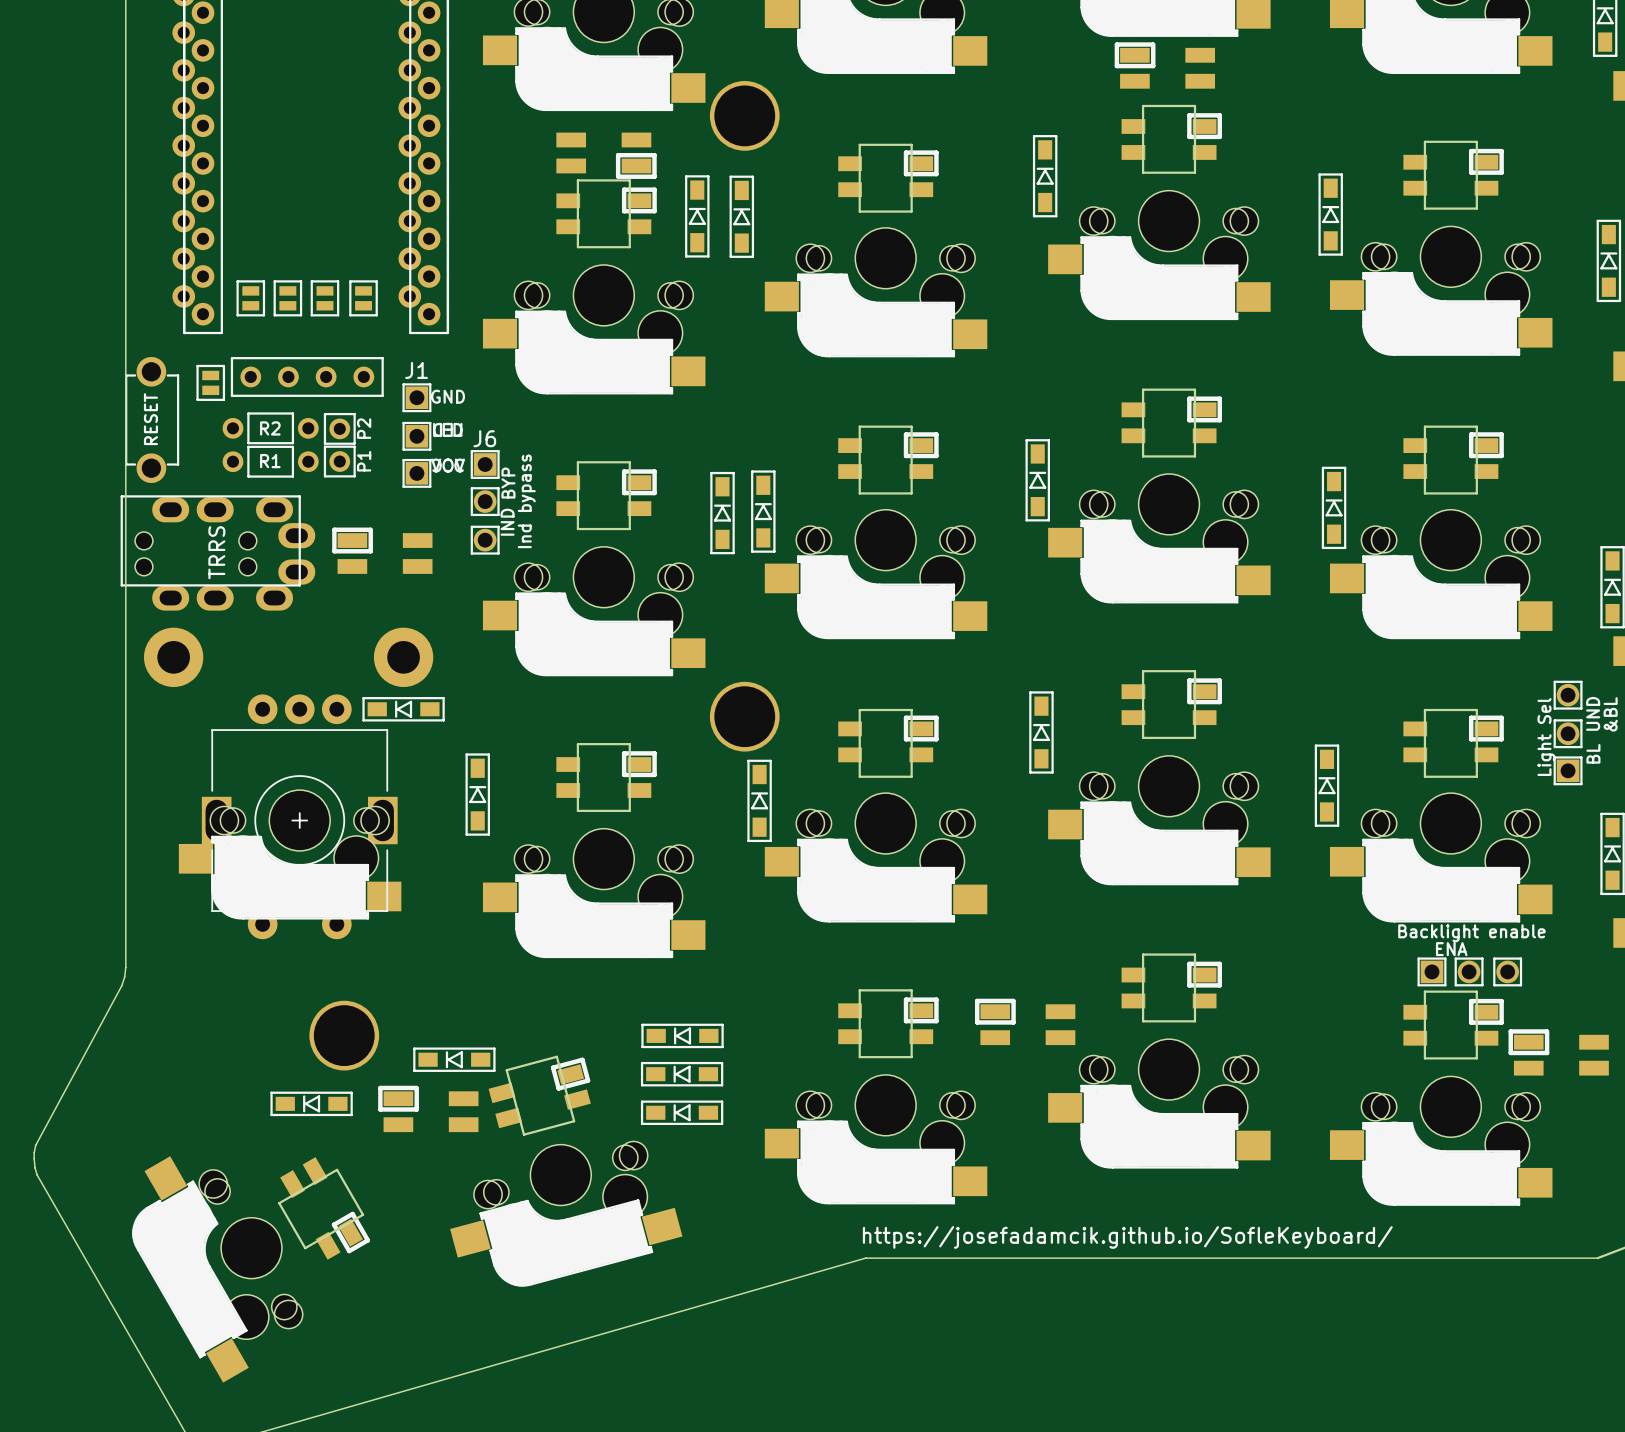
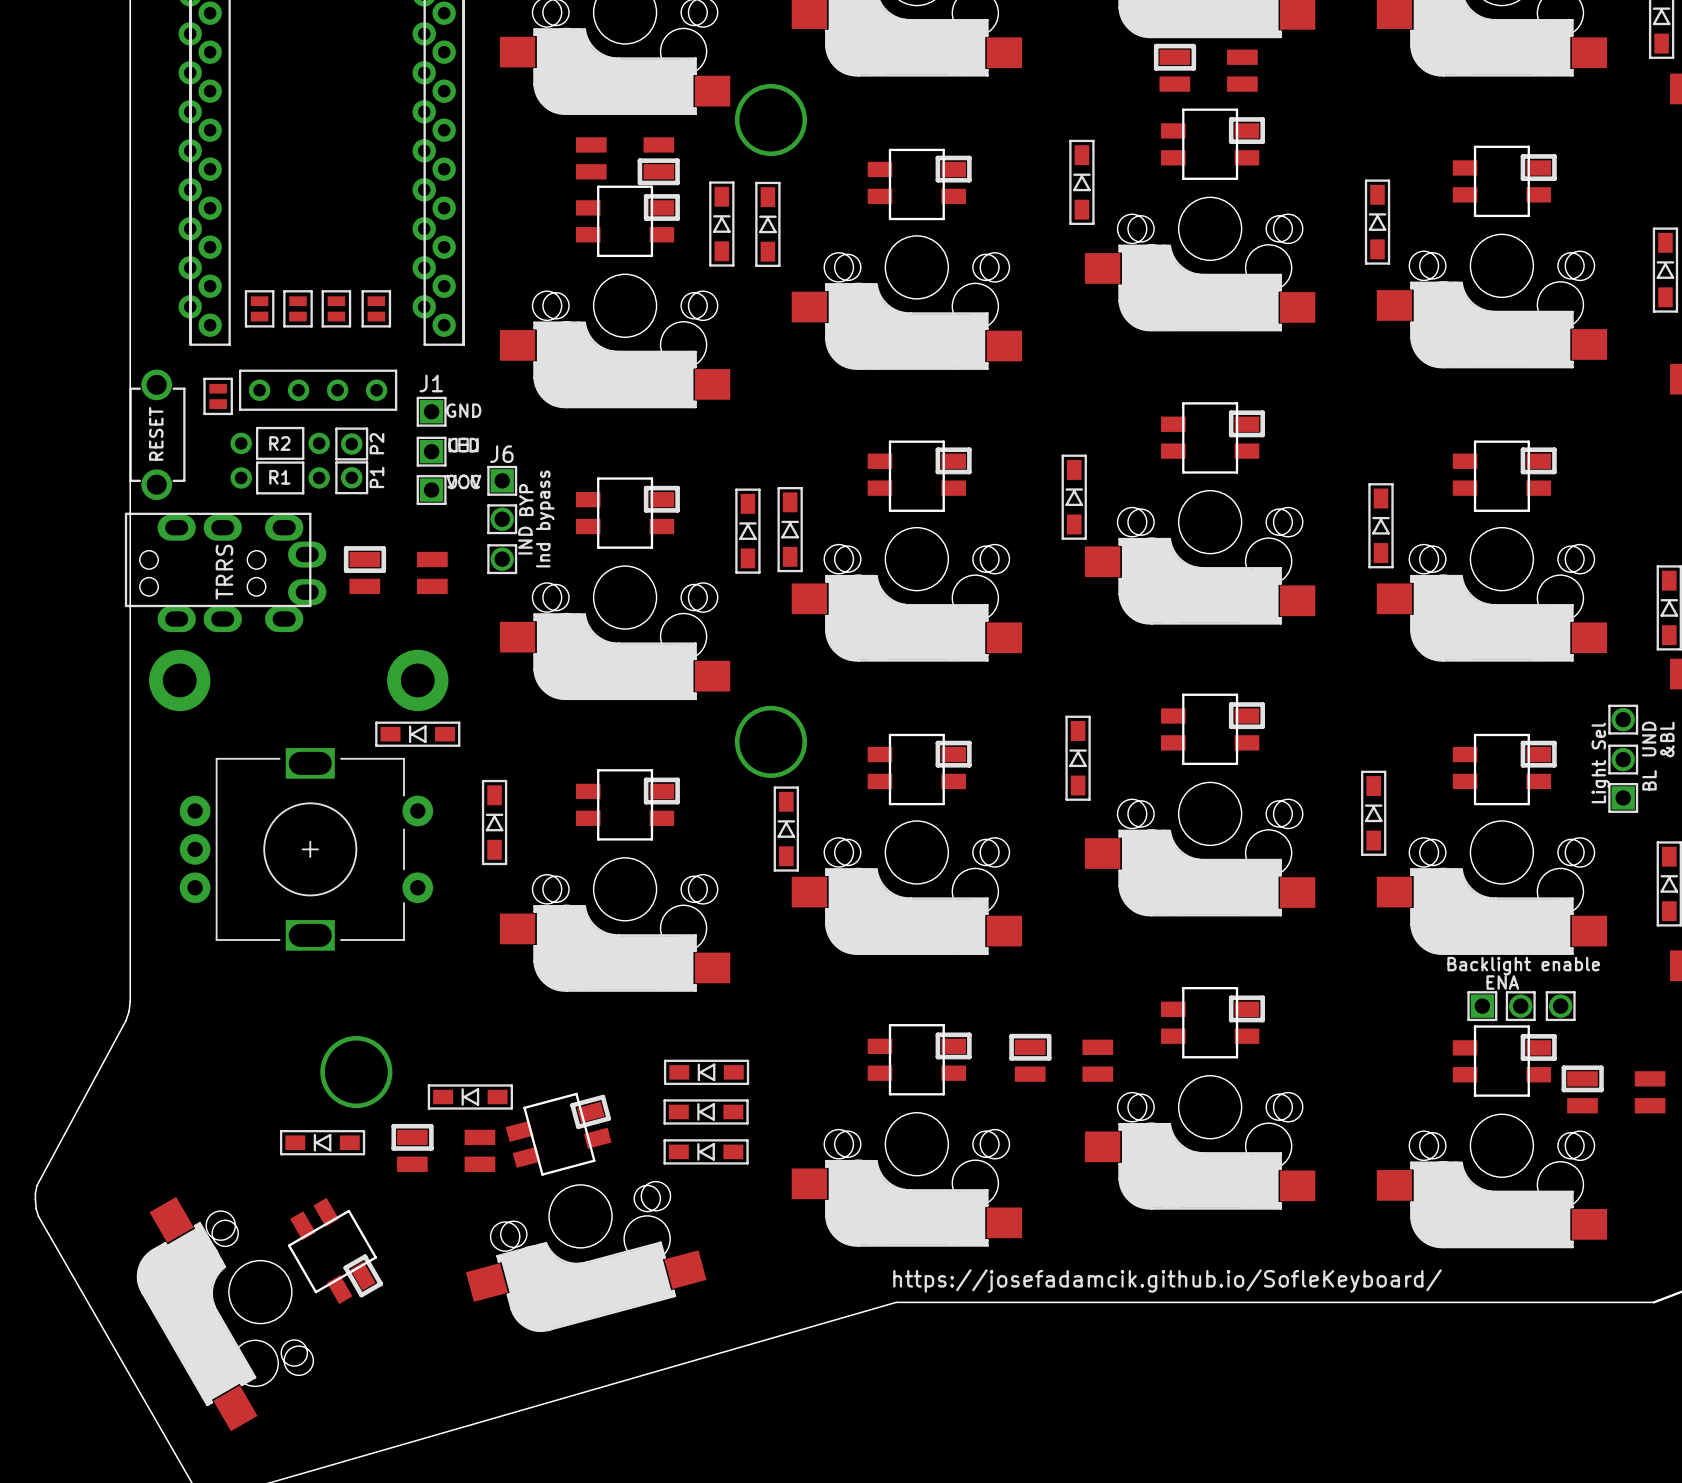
part rotation: 0° (299, 816) -> 90° counterclockwise (306, 849)
part: (290, 854) -> none

